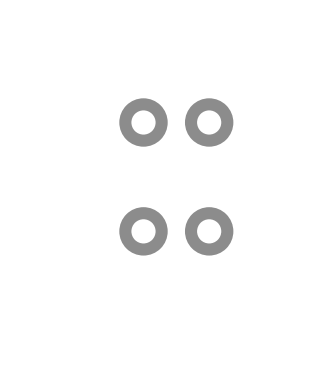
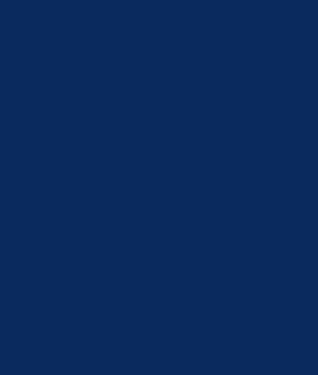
part: (176, 122) -> none
part: (176, 231) -> none

